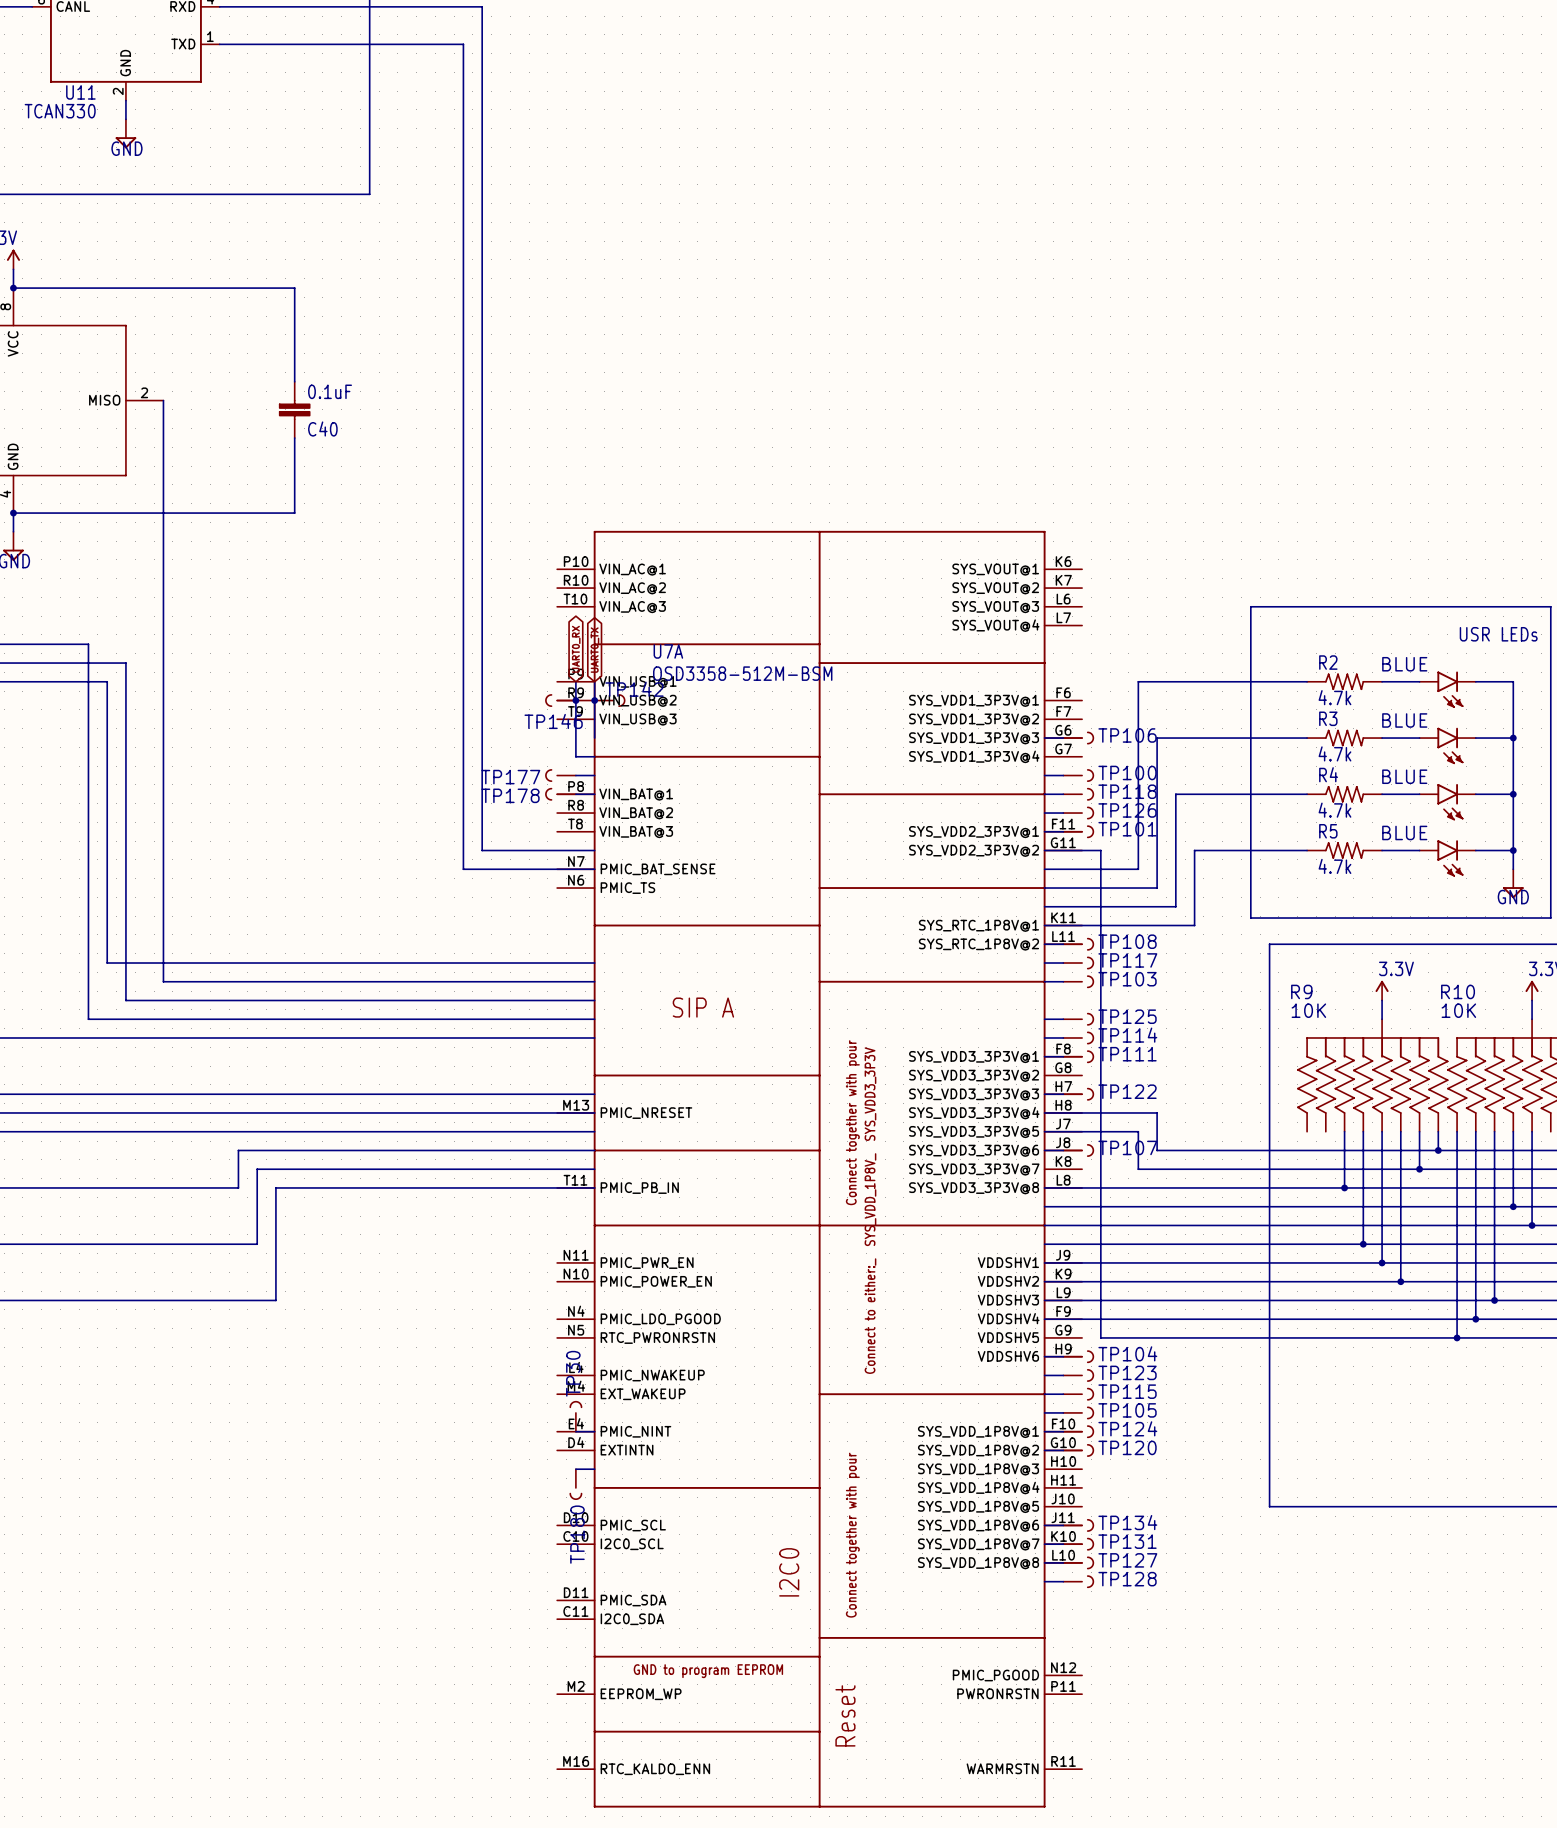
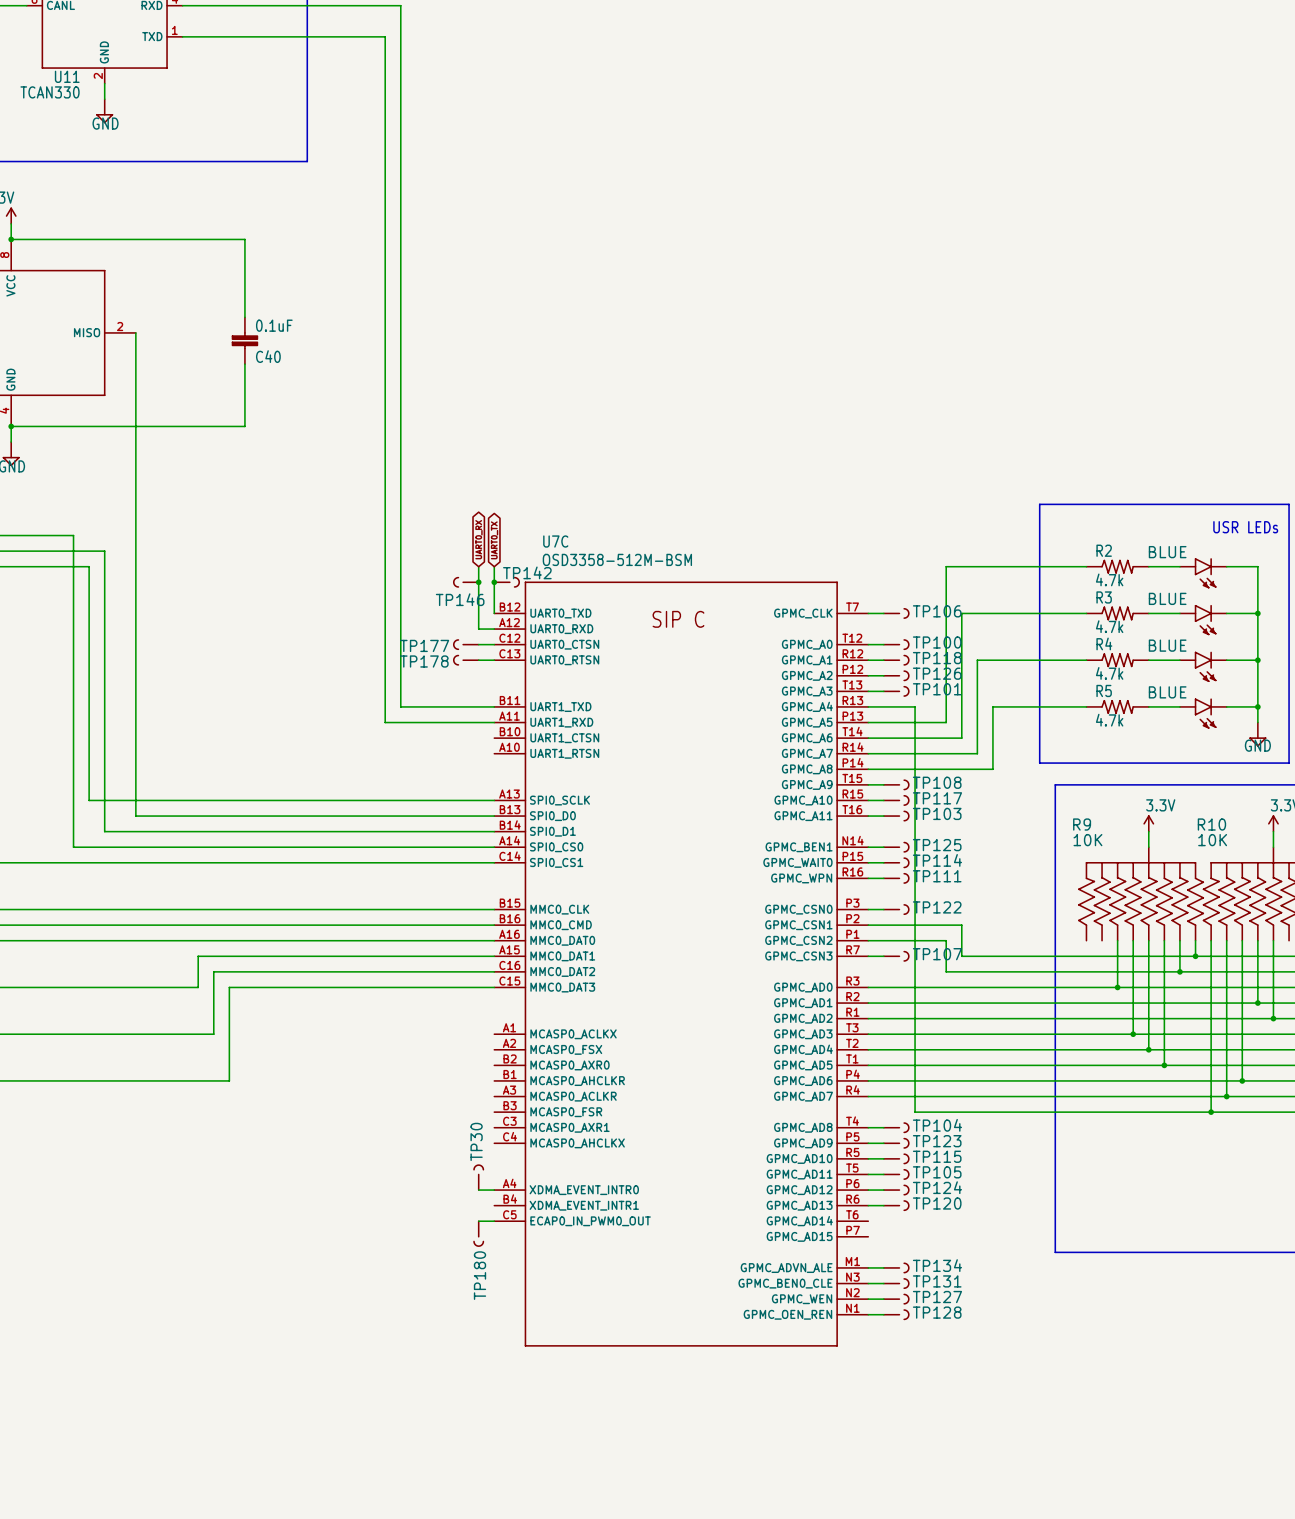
U7C: none -> OSD3358-512M-BSM (681, 964)
U7A: OSD3358-512M-BSM (819, 1169) -> none

